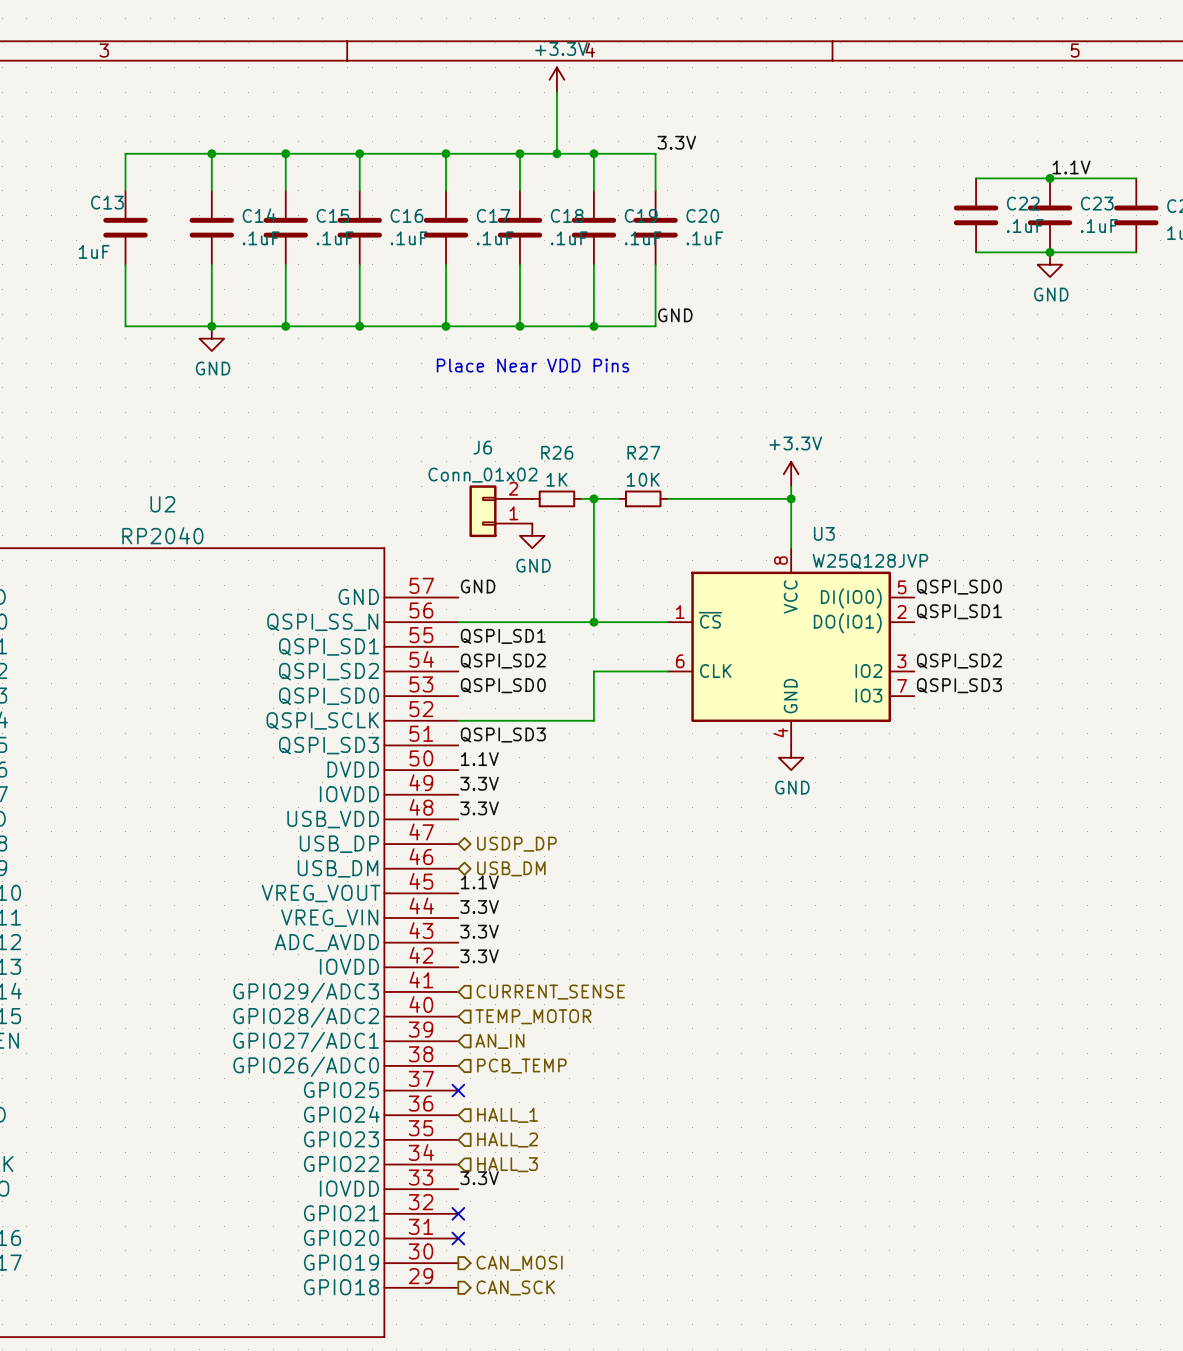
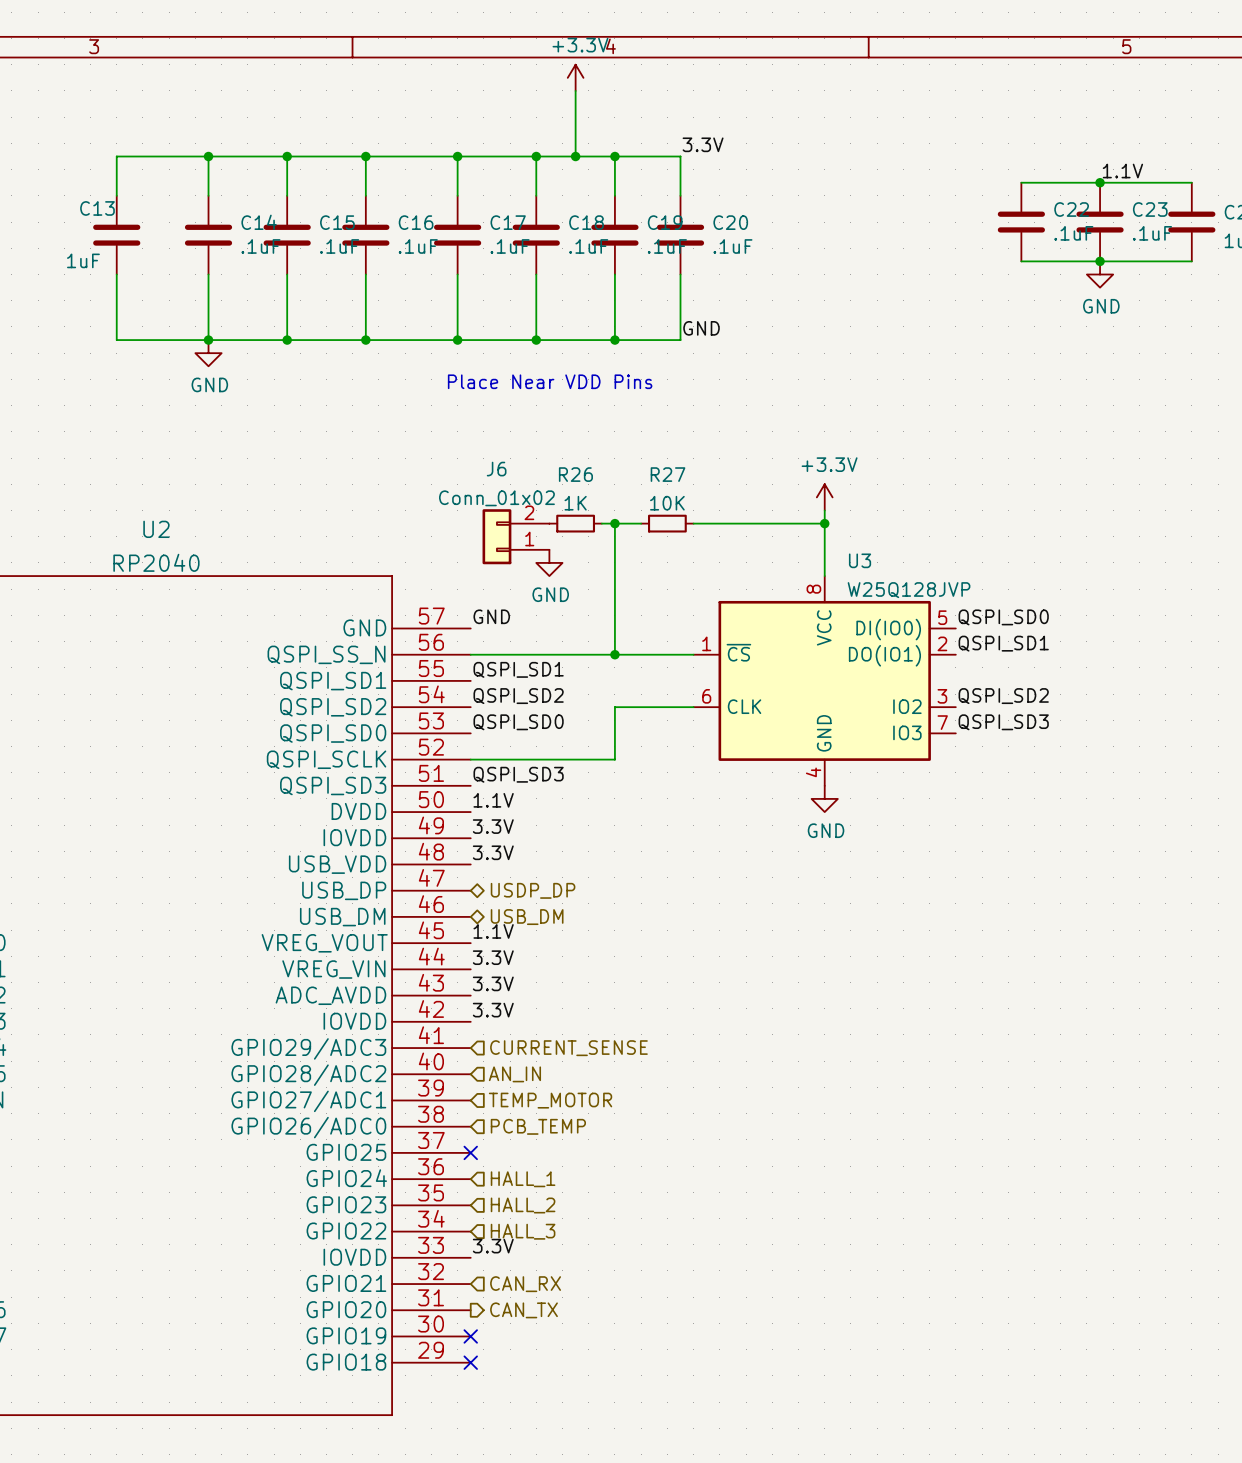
hierarchical label: TEMP_MOTOR (533, 1016) -> AN_IN (514, 1074)
hierarchical label: AN_IN (499, 1041) -> TEMP_MOTOR (550, 1100)
no-connect mark: (458, 1213) -> none
hierarchical label: none -> CAN_RX (525, 1284)
no-connect mark: (458, 1238) -> none
hierarchical label: none -> CAN_TX (524, 1310)
no-connect mark: none -> (470, 1336)
hierarchical label: CAN_MOSI (519, 1263) -> none
no-connect mark: none -> (470, 1362)
hierarchical label: CAN_SCK (515, 1287) -> none

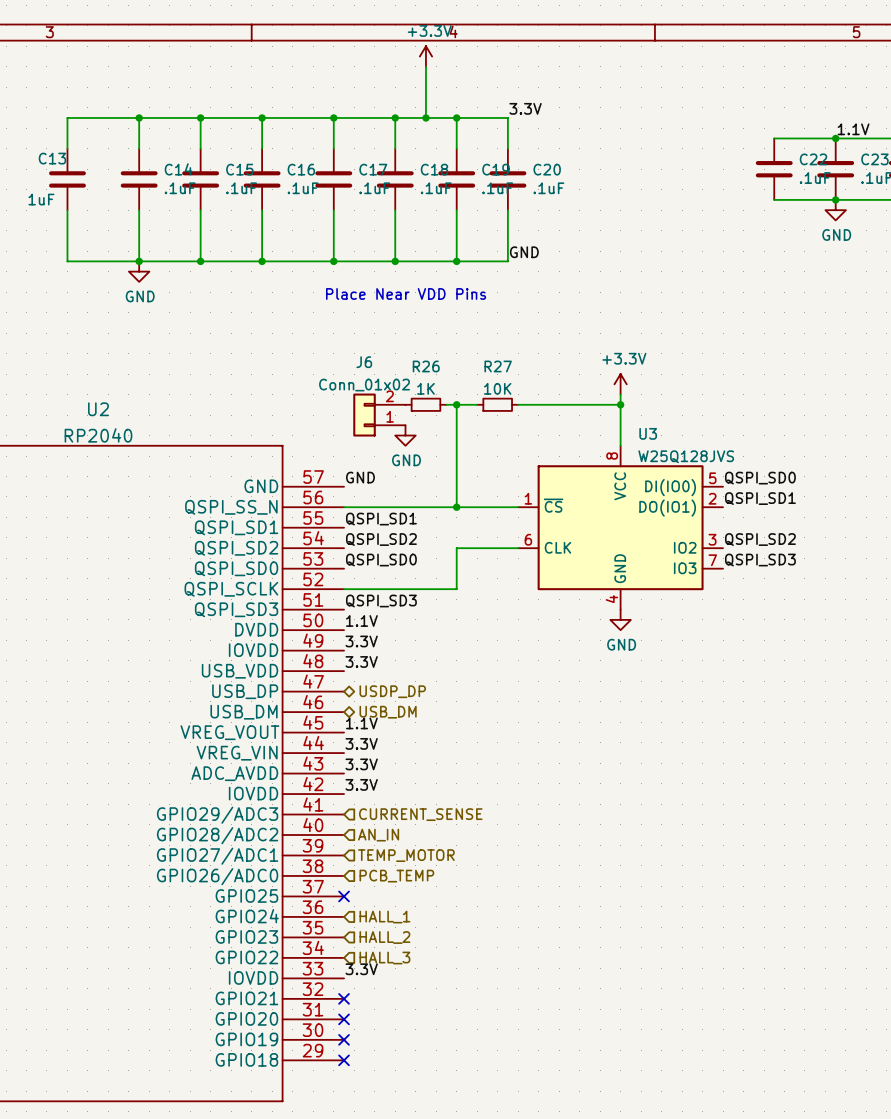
U3 value: W25Q128JVP (909, 590) -> W25Q128JVS (686, 456)
no-connect mark: none -> (344, 998)
hierarchical label: CAN_RX (525, 1284) -> none
no-connect mark: none -> (344, 1019)
hierarchical label: CAN_TX (524, 1310) -> none

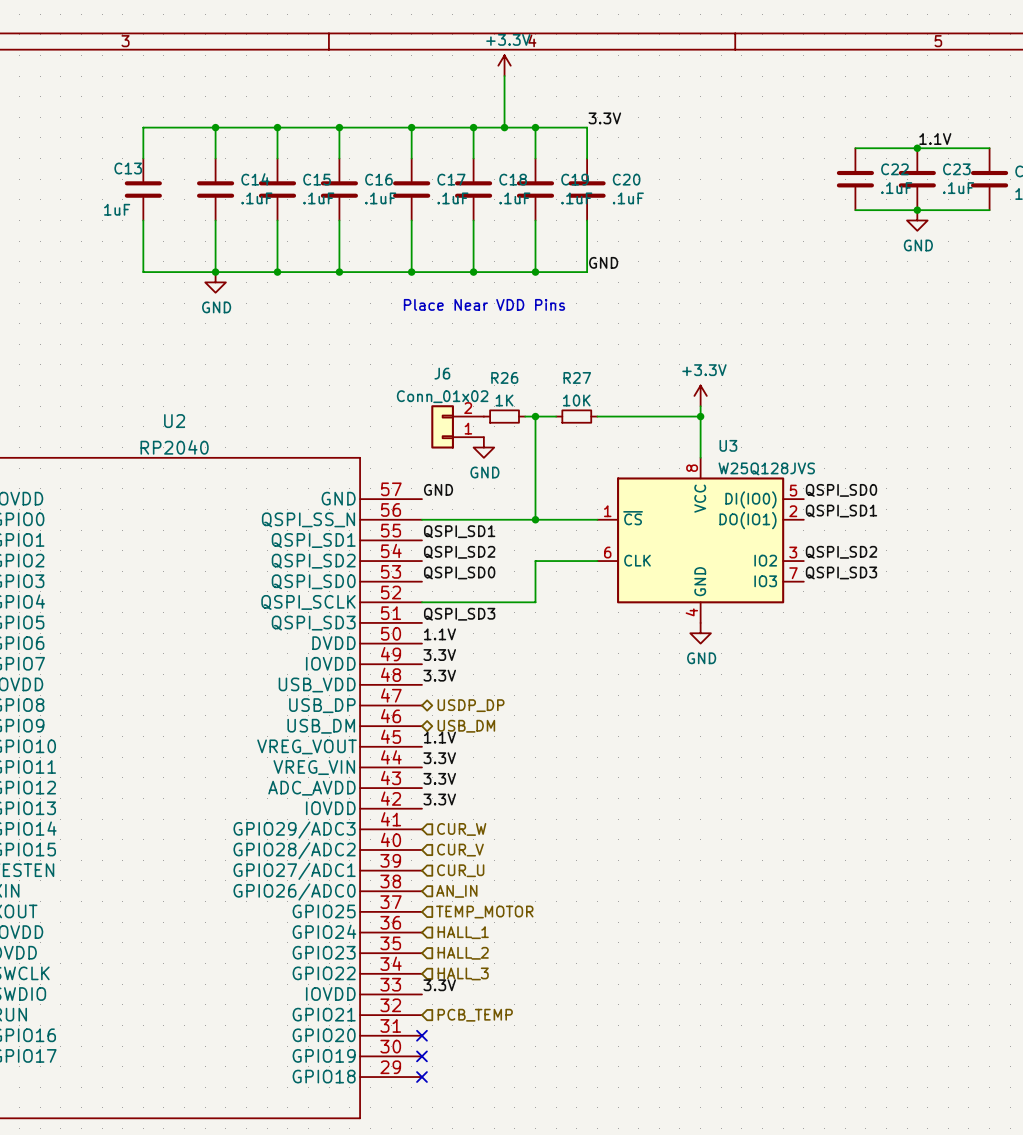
hierarchical label: CURRENT_SENSE (420, 814) -> CUR_W (461, 829)
hierarchical label: AN_IN (378, 835) -> CUR_V (460, 850)
hierarchical label: TEMP_MOTOR (406, 855) -> CUR_U (460, 870)
hierarchical label: PCB_TEMP (396, 876) -> AN_IN (456, 891)
no-connect mark: (344, 896) -> none
hierarchical label: none -> TEMP_MOTOR (484, 912)
no-connect mark: (344, 998) -> none
hierarchical label: none -> PCB_TEMP (475, 1015)

